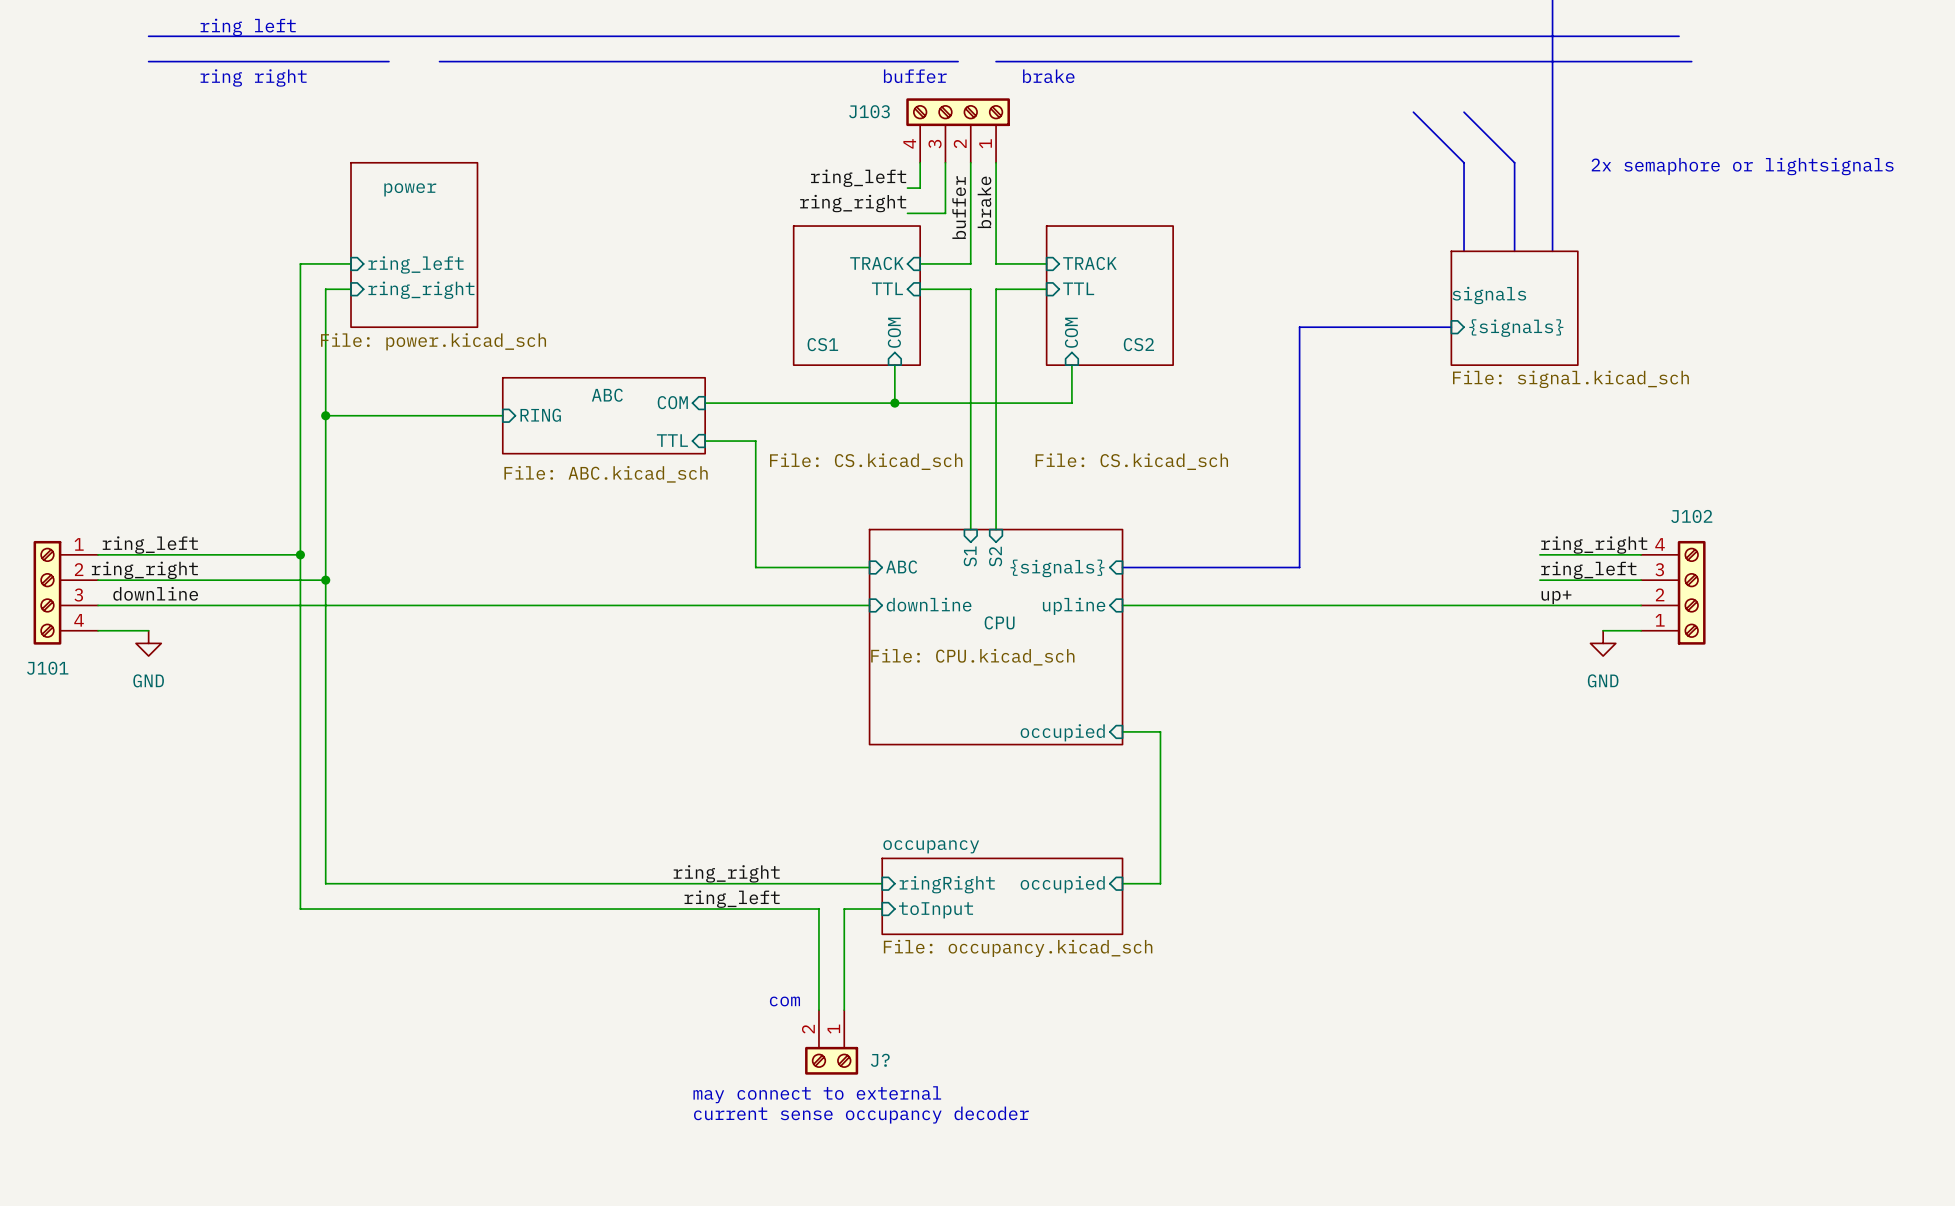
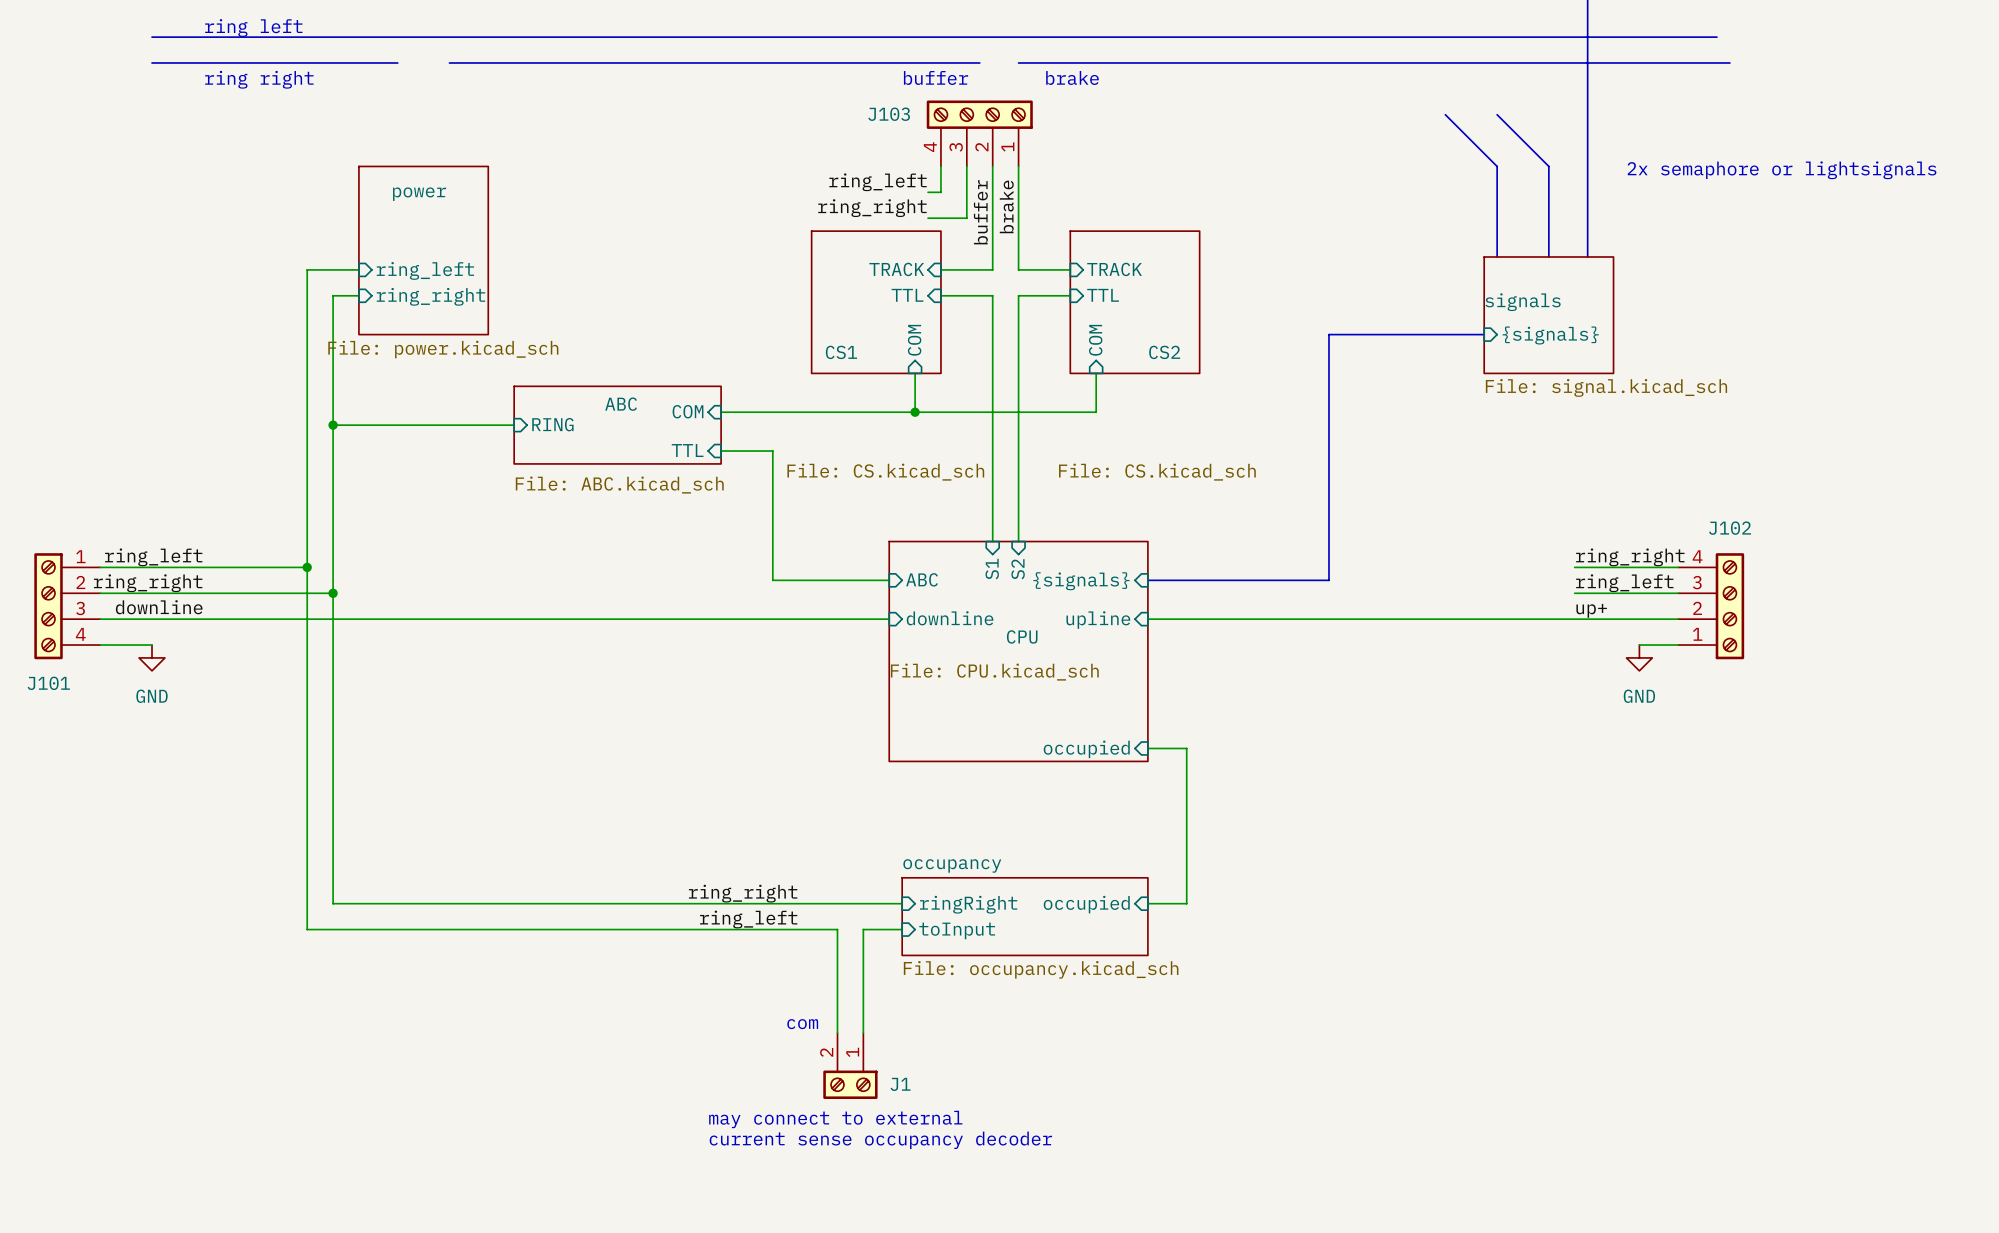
J? name: J? (880, 1060) -> J1 (900, 1084)

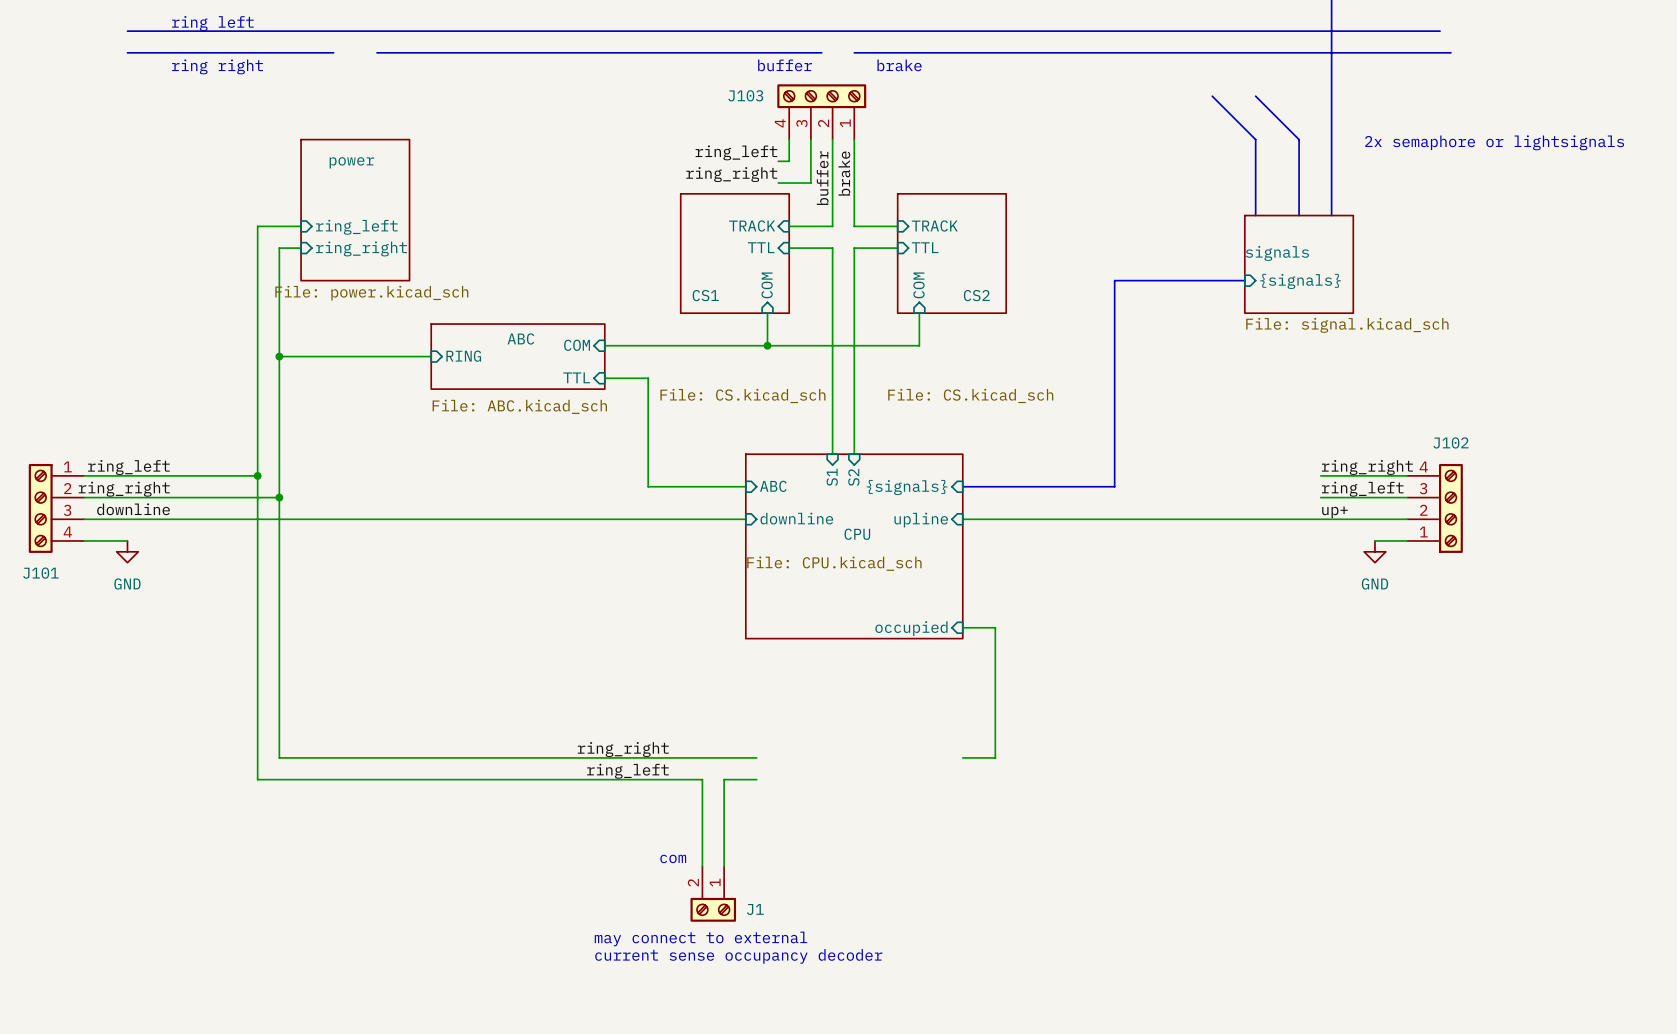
sheet pin: ringRight (968, 904) -> none
sheet pin: occupied (1086, 904) -> none
sheet occupancy: File: occupancy.kicad_sch (1025, 916) -> none
sheet pin: toInput (957, 930) -> none

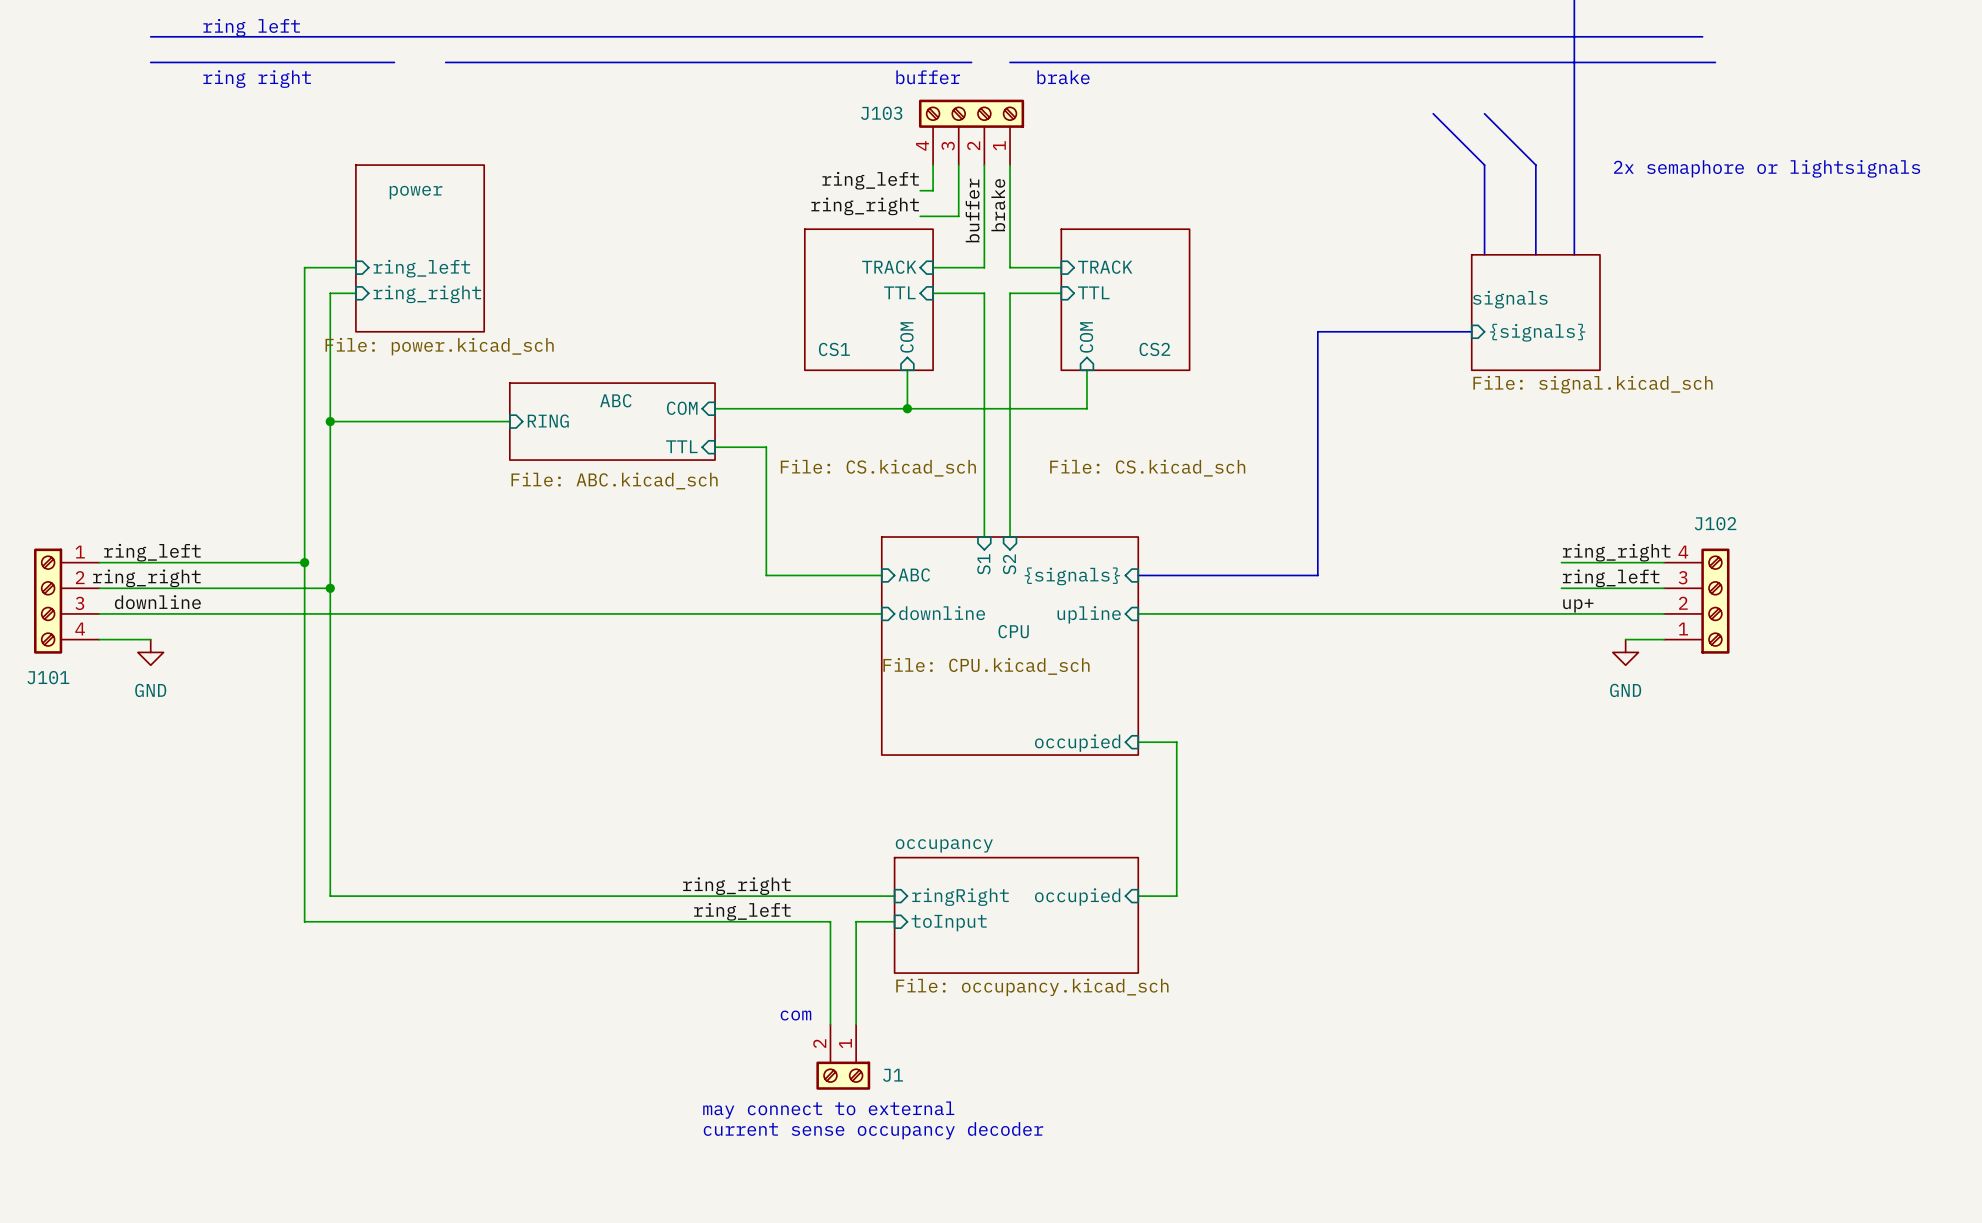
sheet pin: none -> ringRight (960, 897)
sheet pin: none -> occupied (1077, 897)
sheet occupancy: none -> File: occupancy.kicad_sch (1016, 915)
sheet pin: none -> toInput (949, 923)

